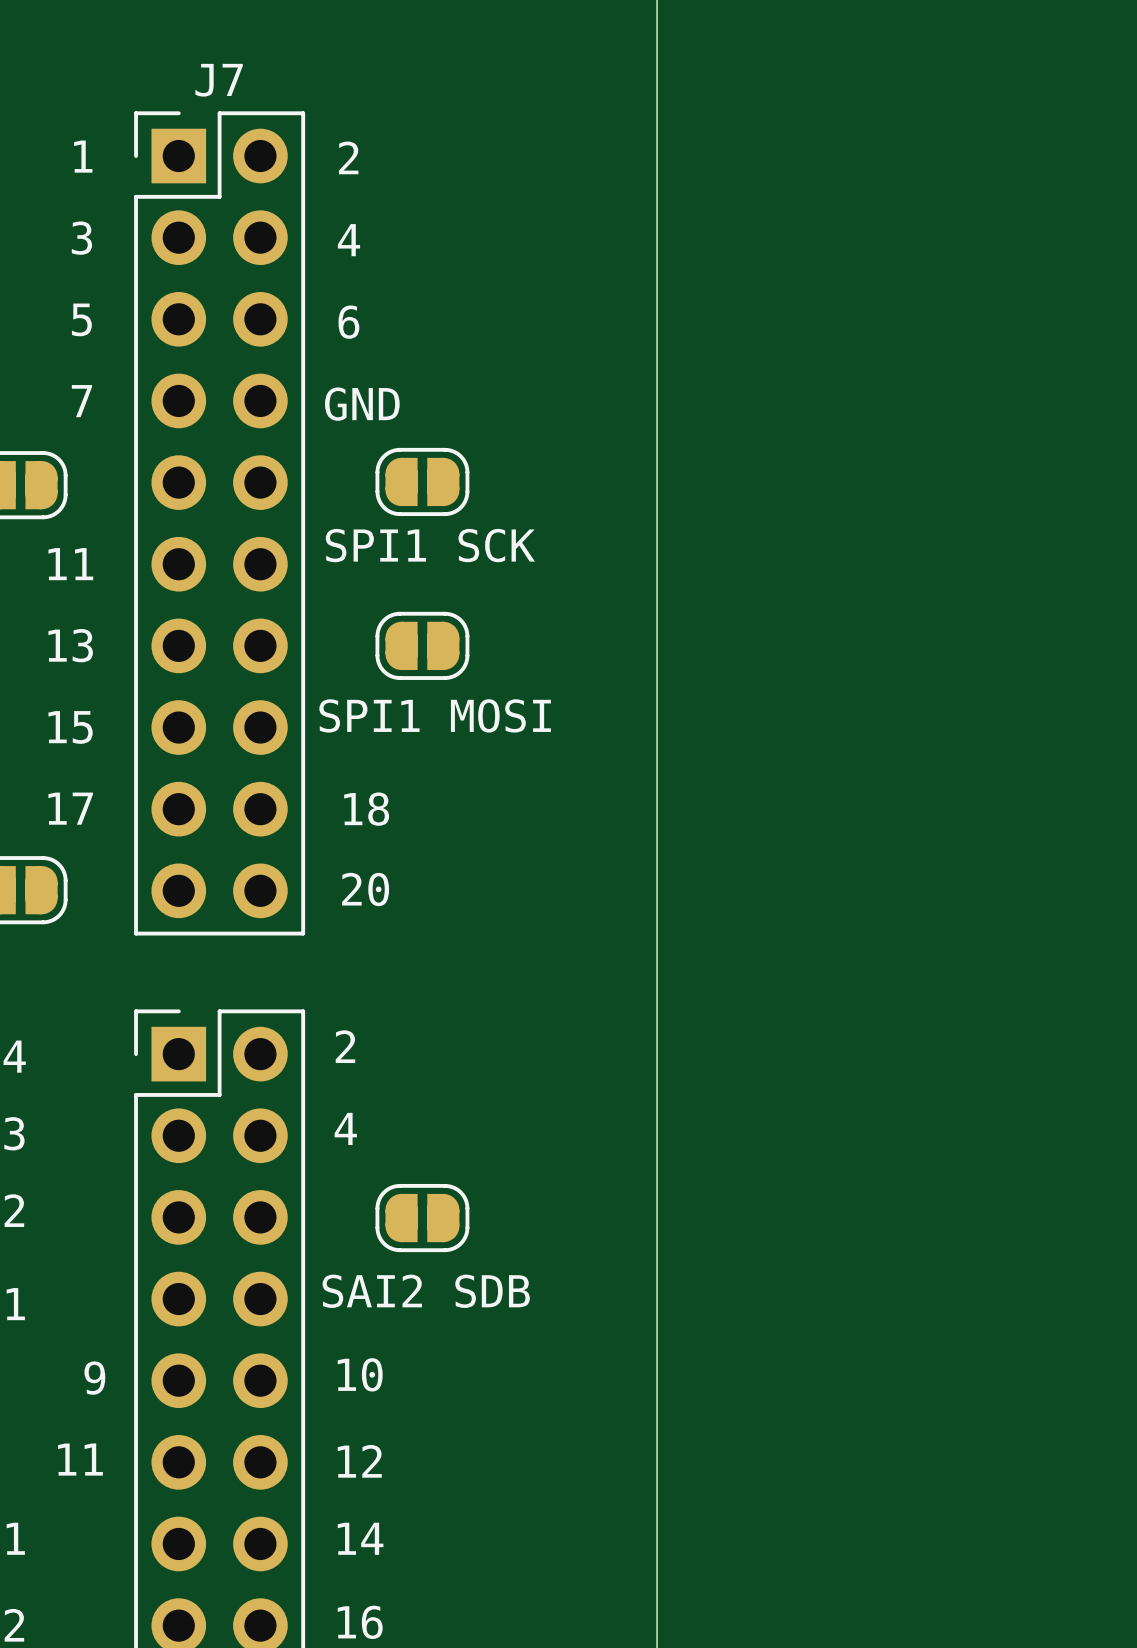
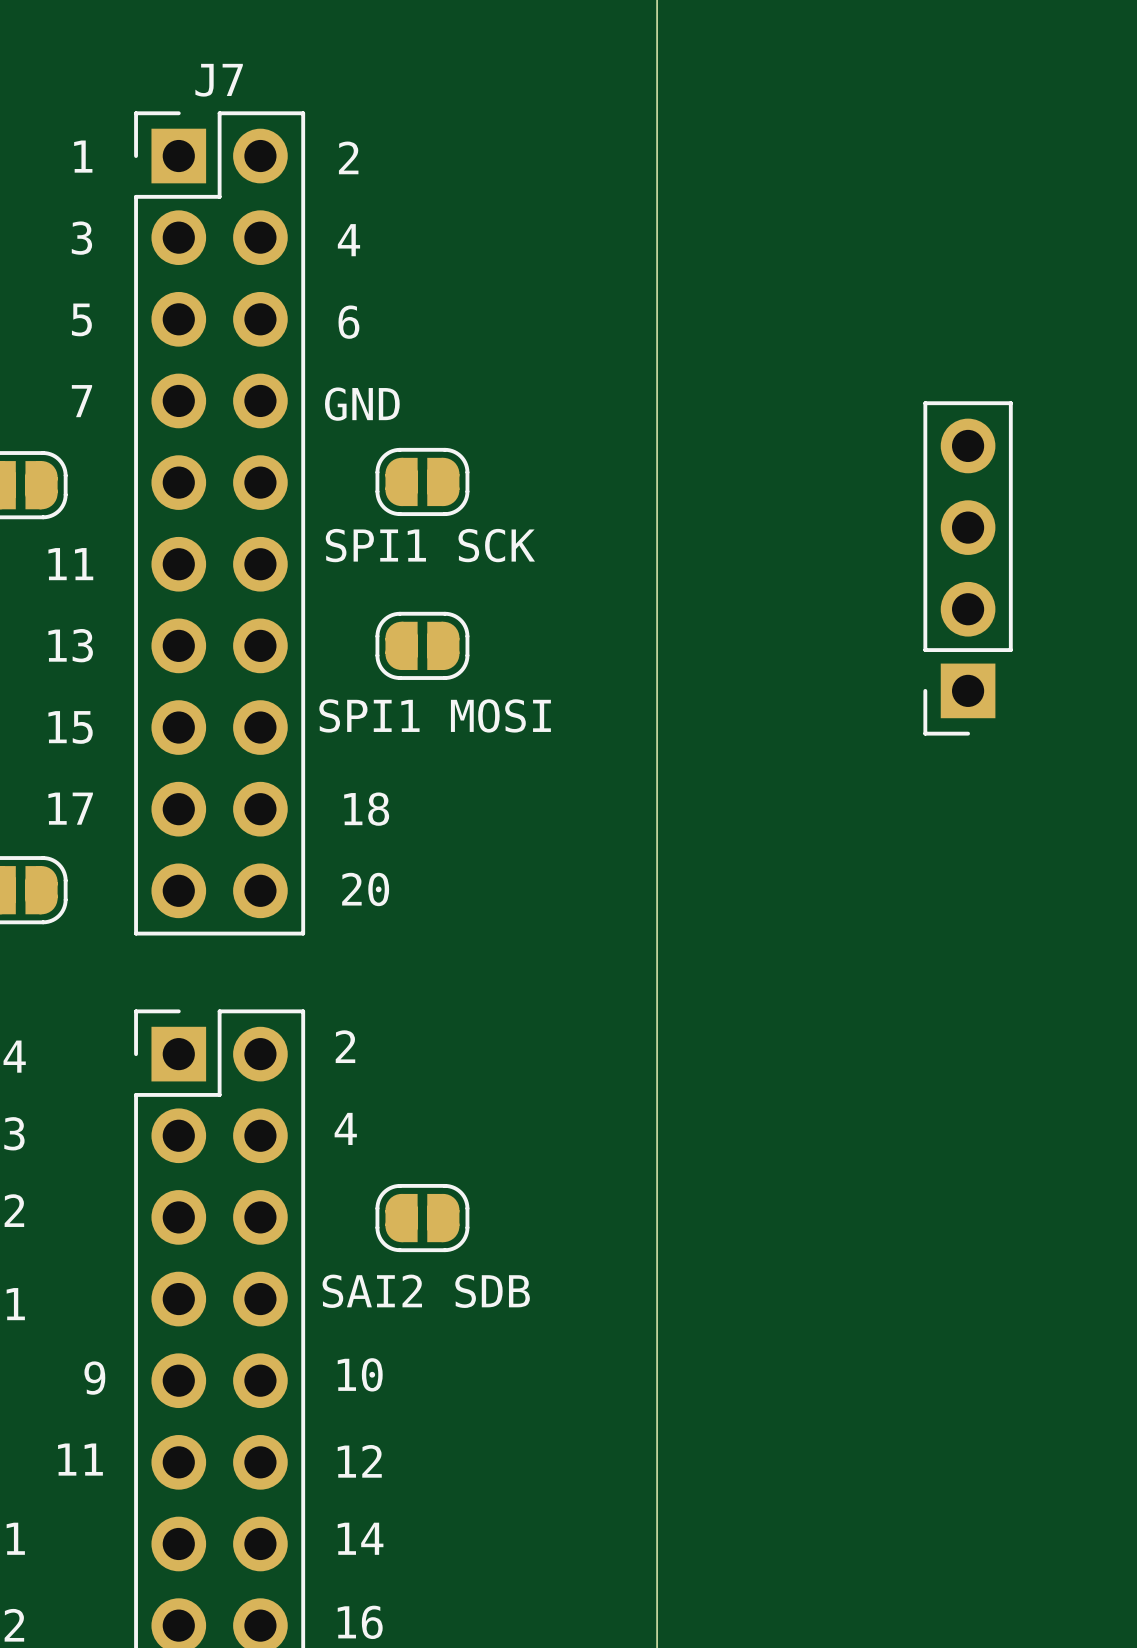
part: none -> (968, 568)

